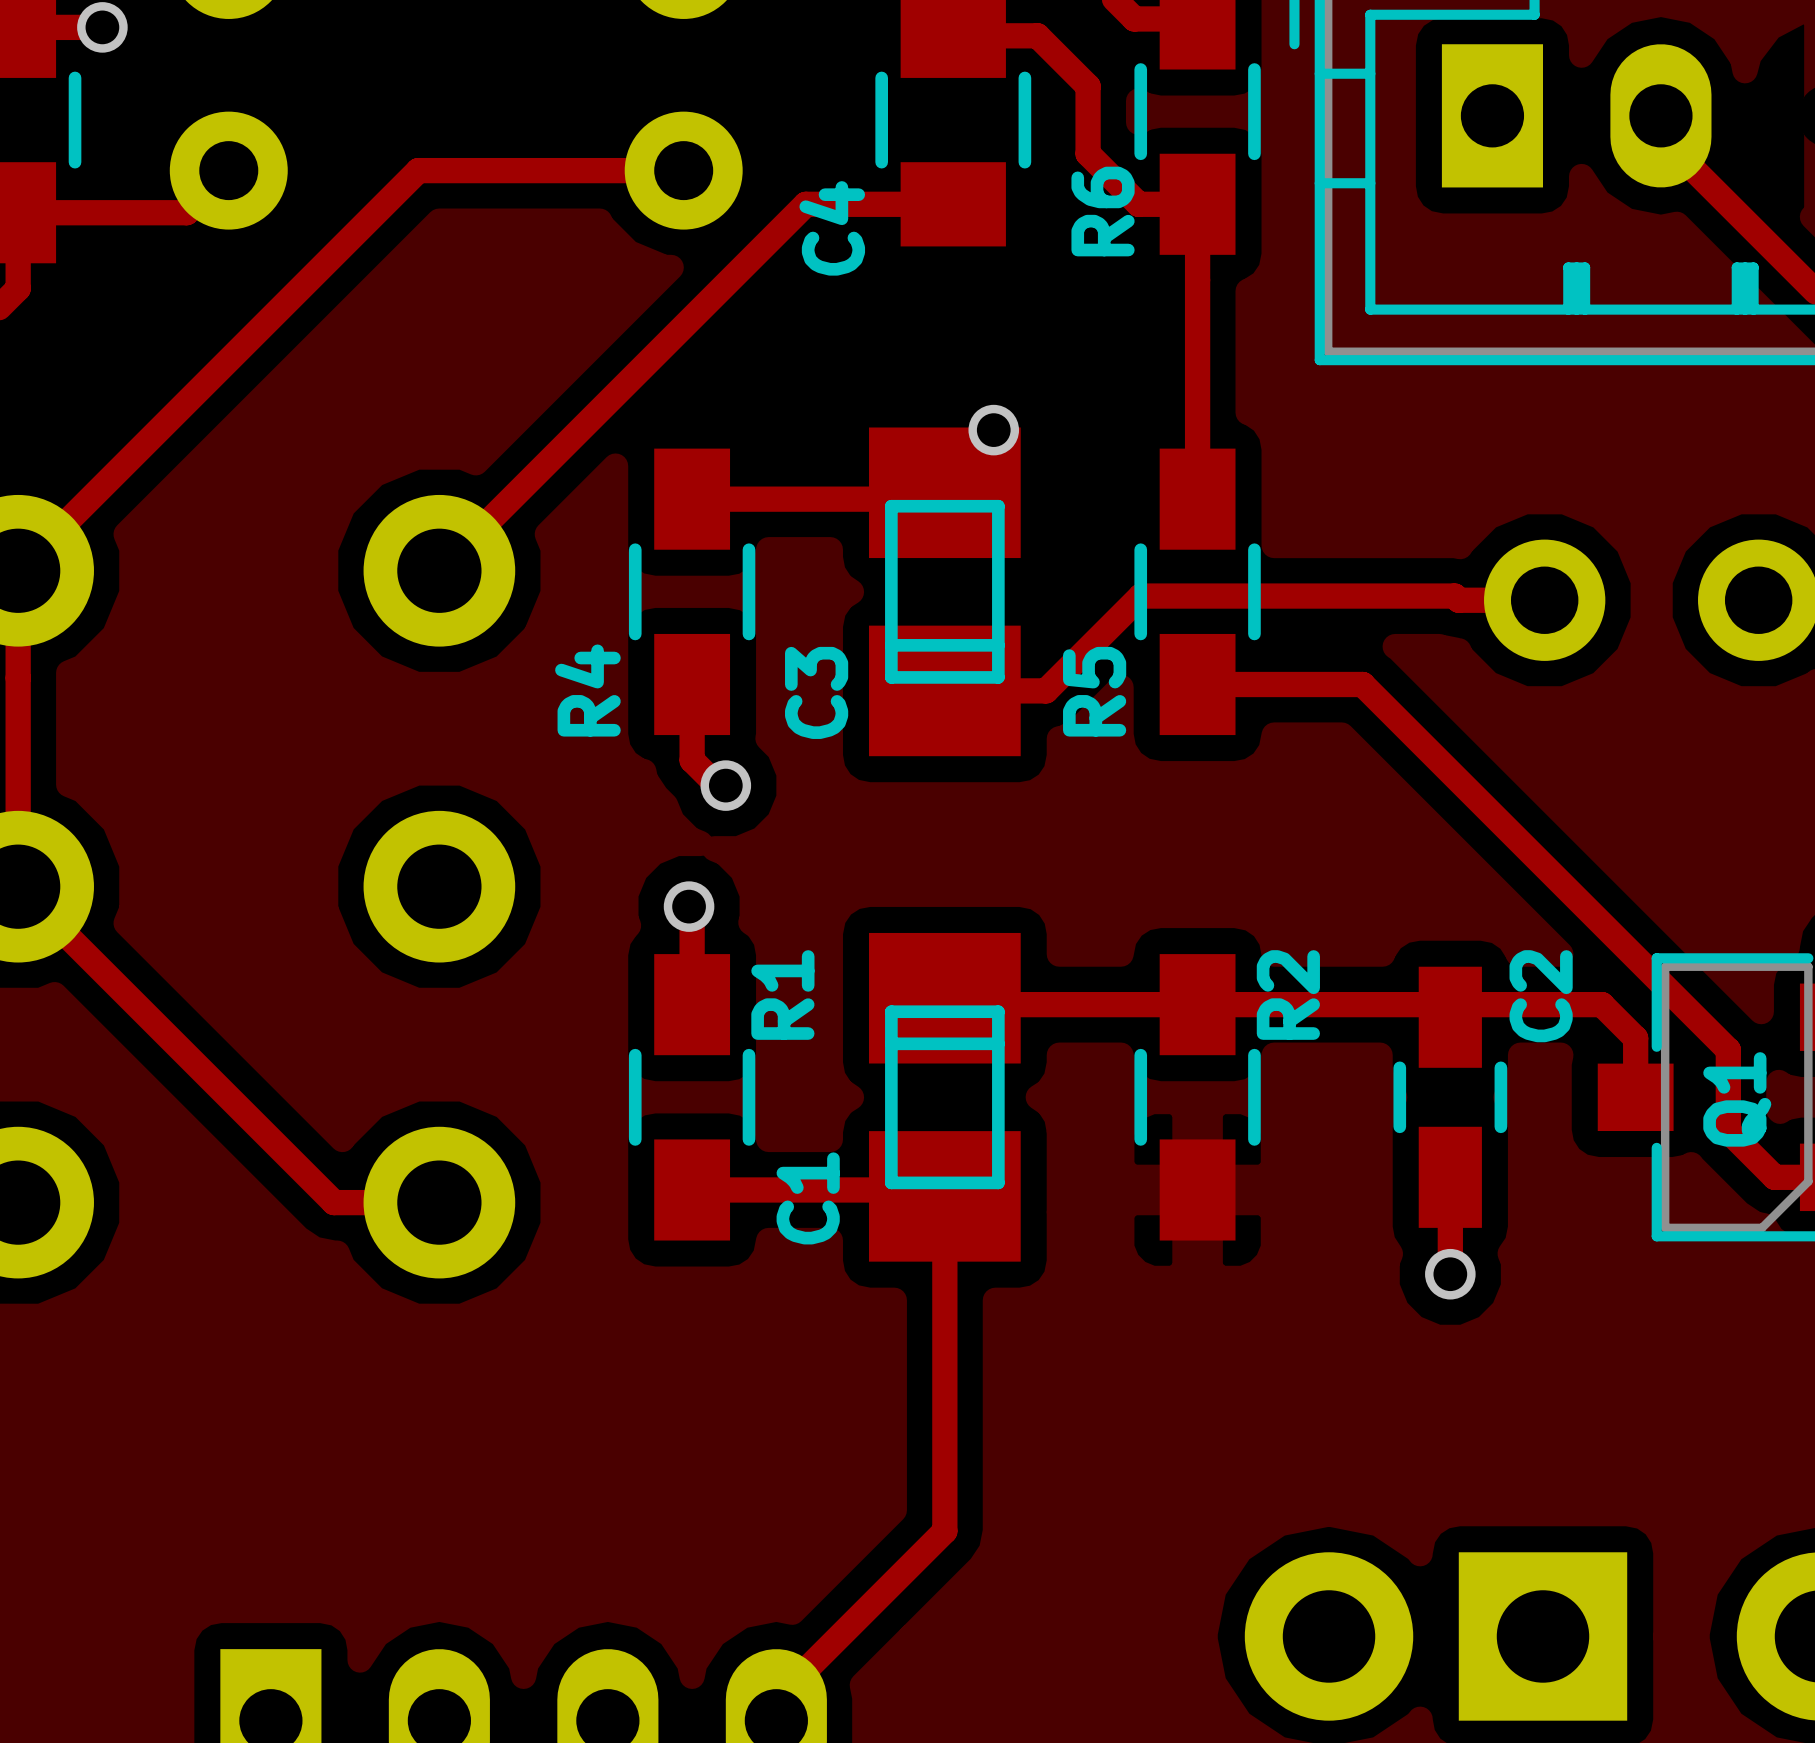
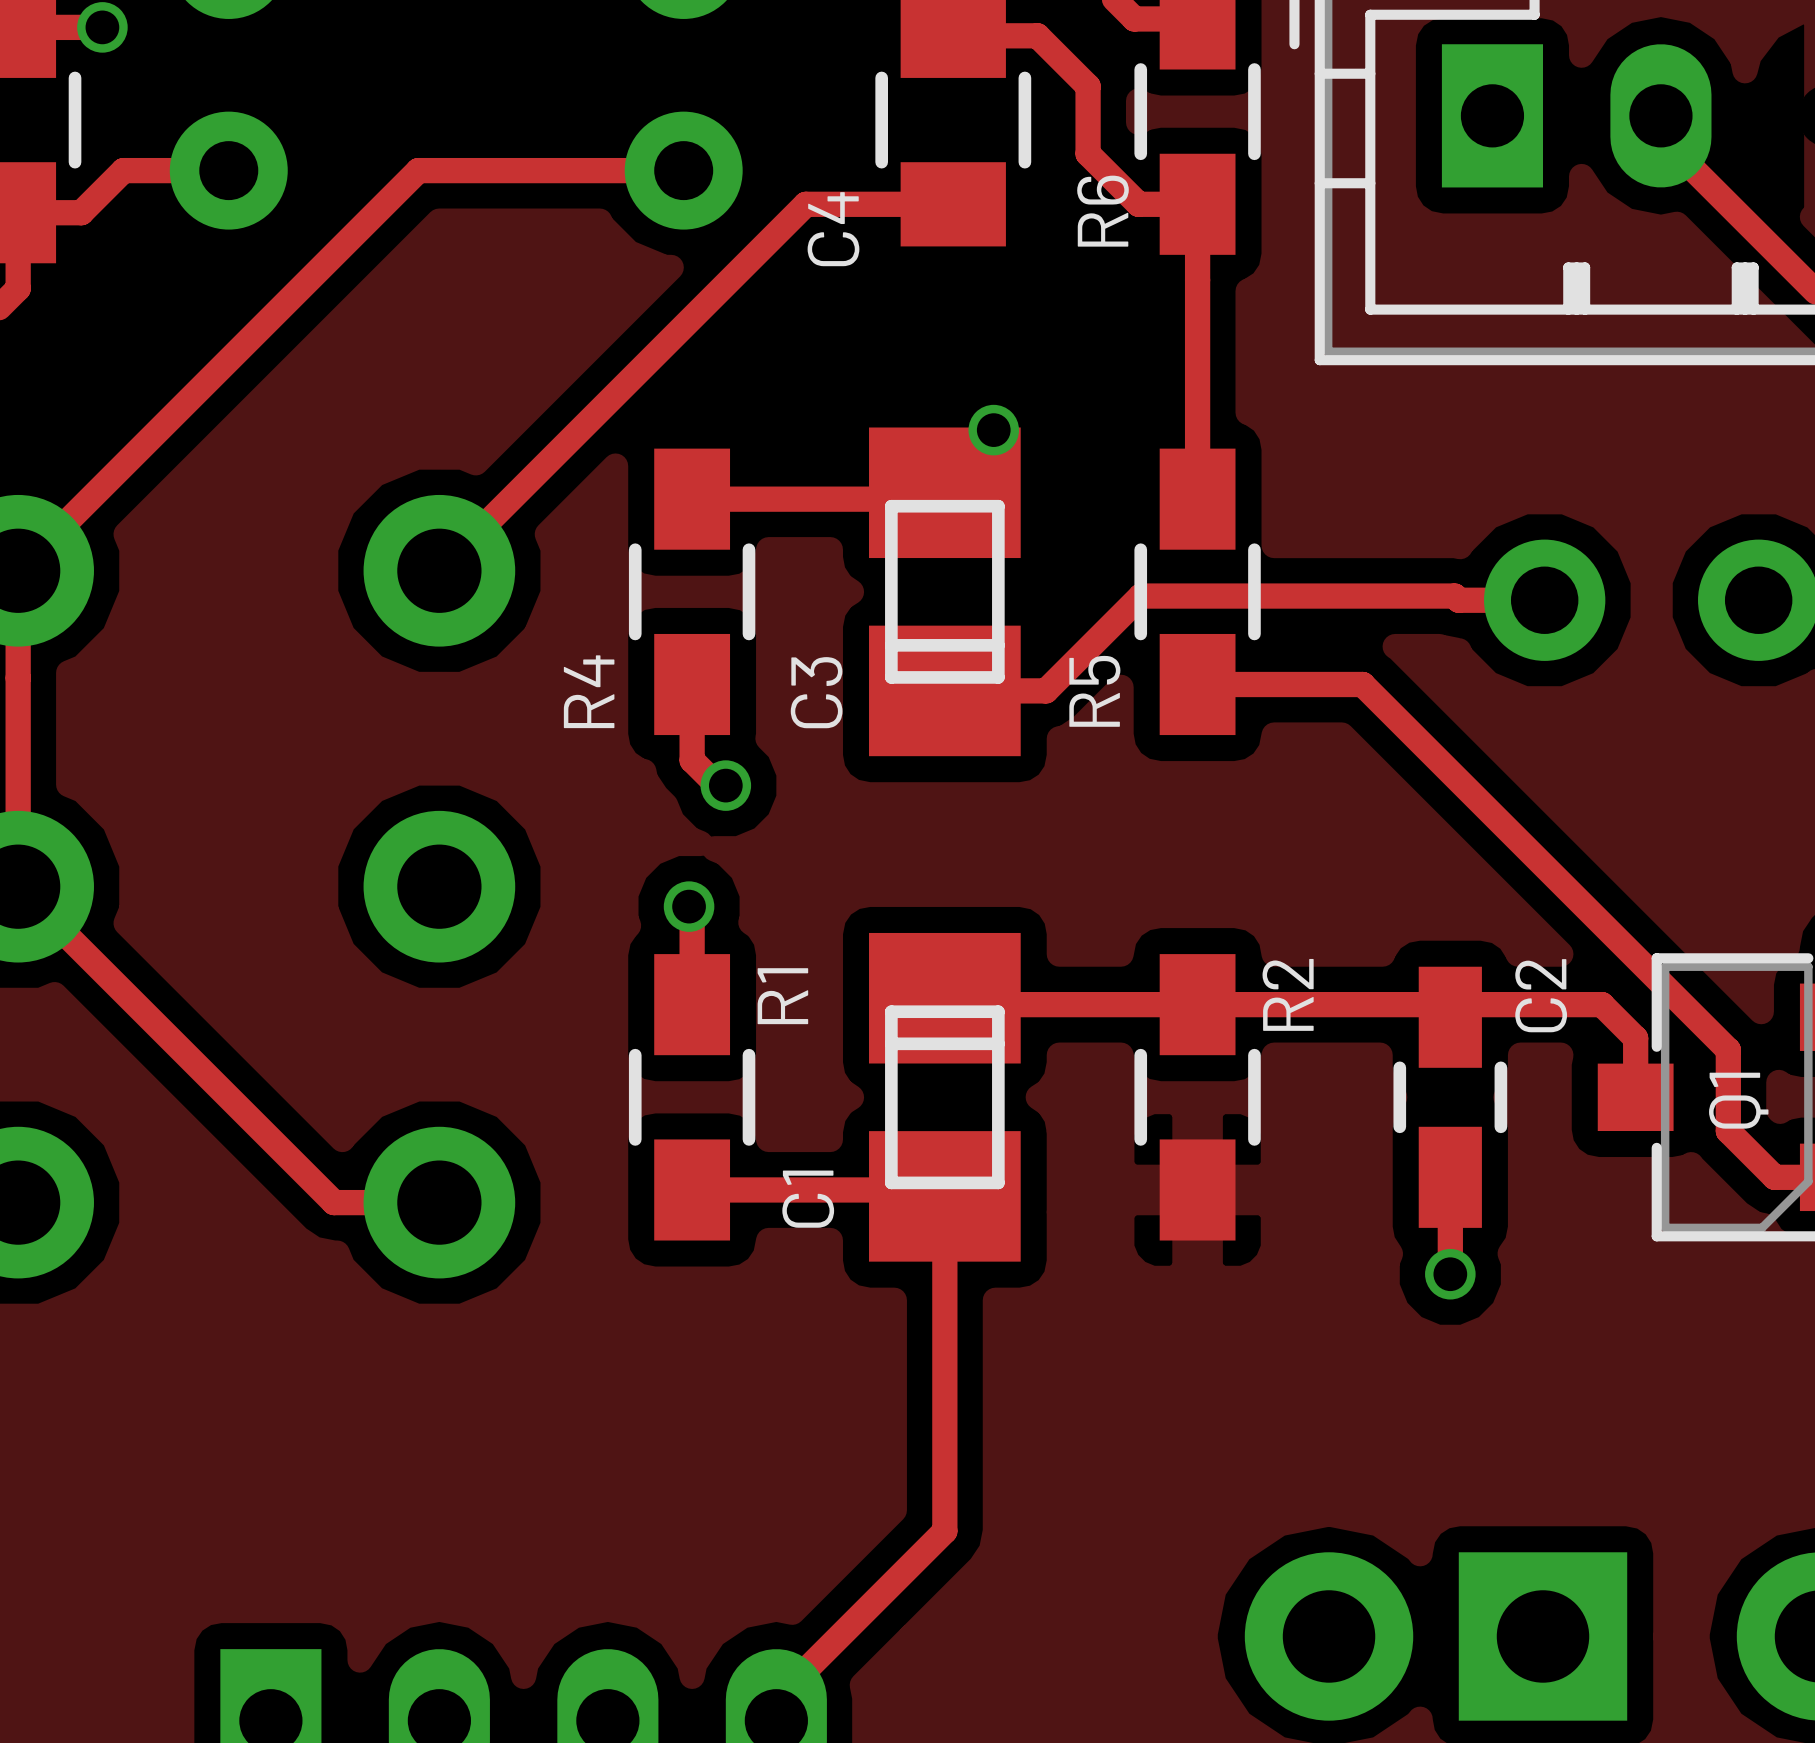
track: (228, 170) (186, 212) (81, 212) -> (228, 170) (123, 170) (81, 212)

